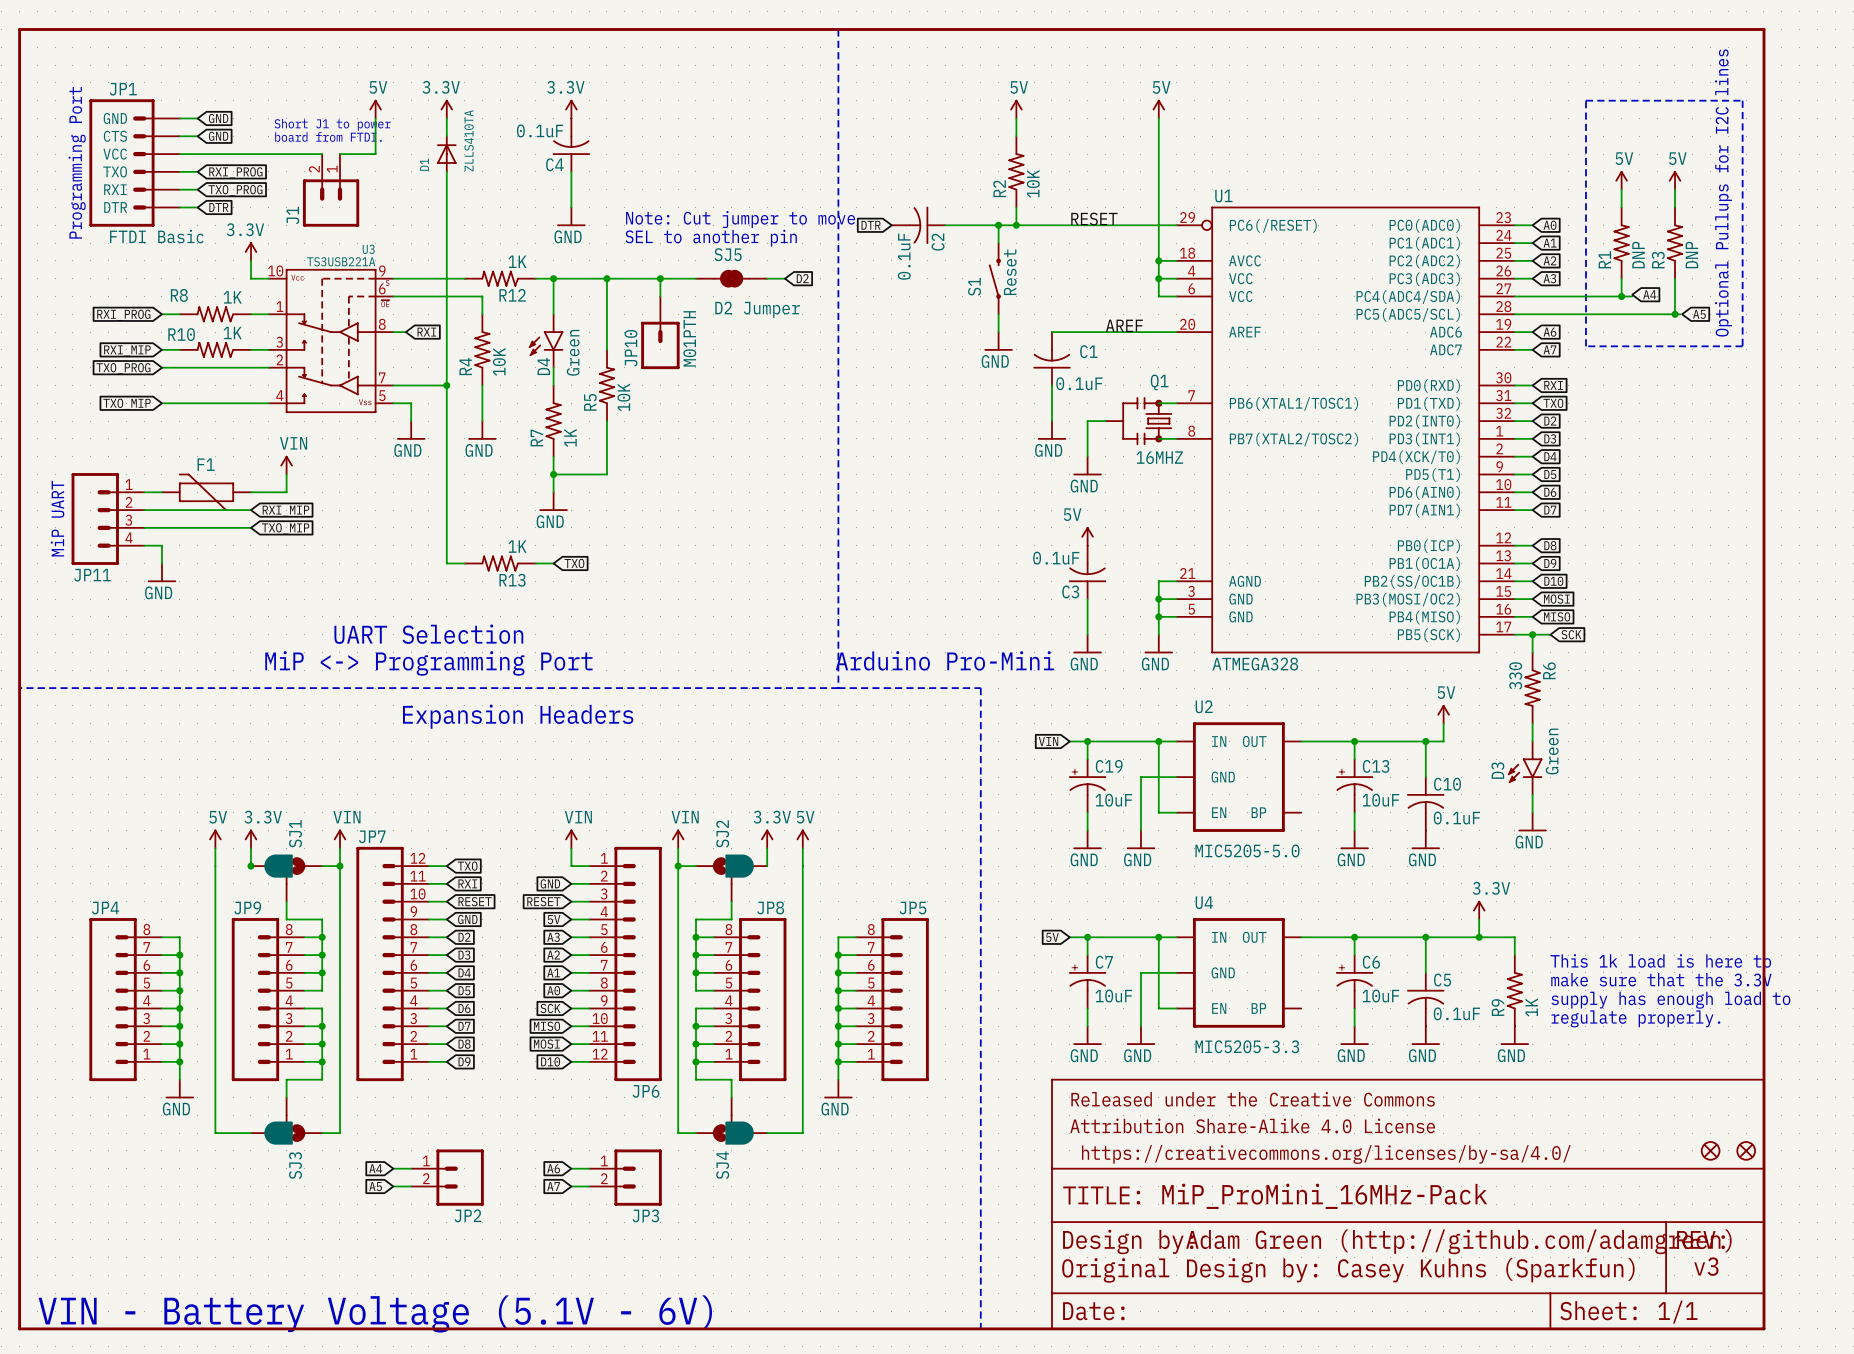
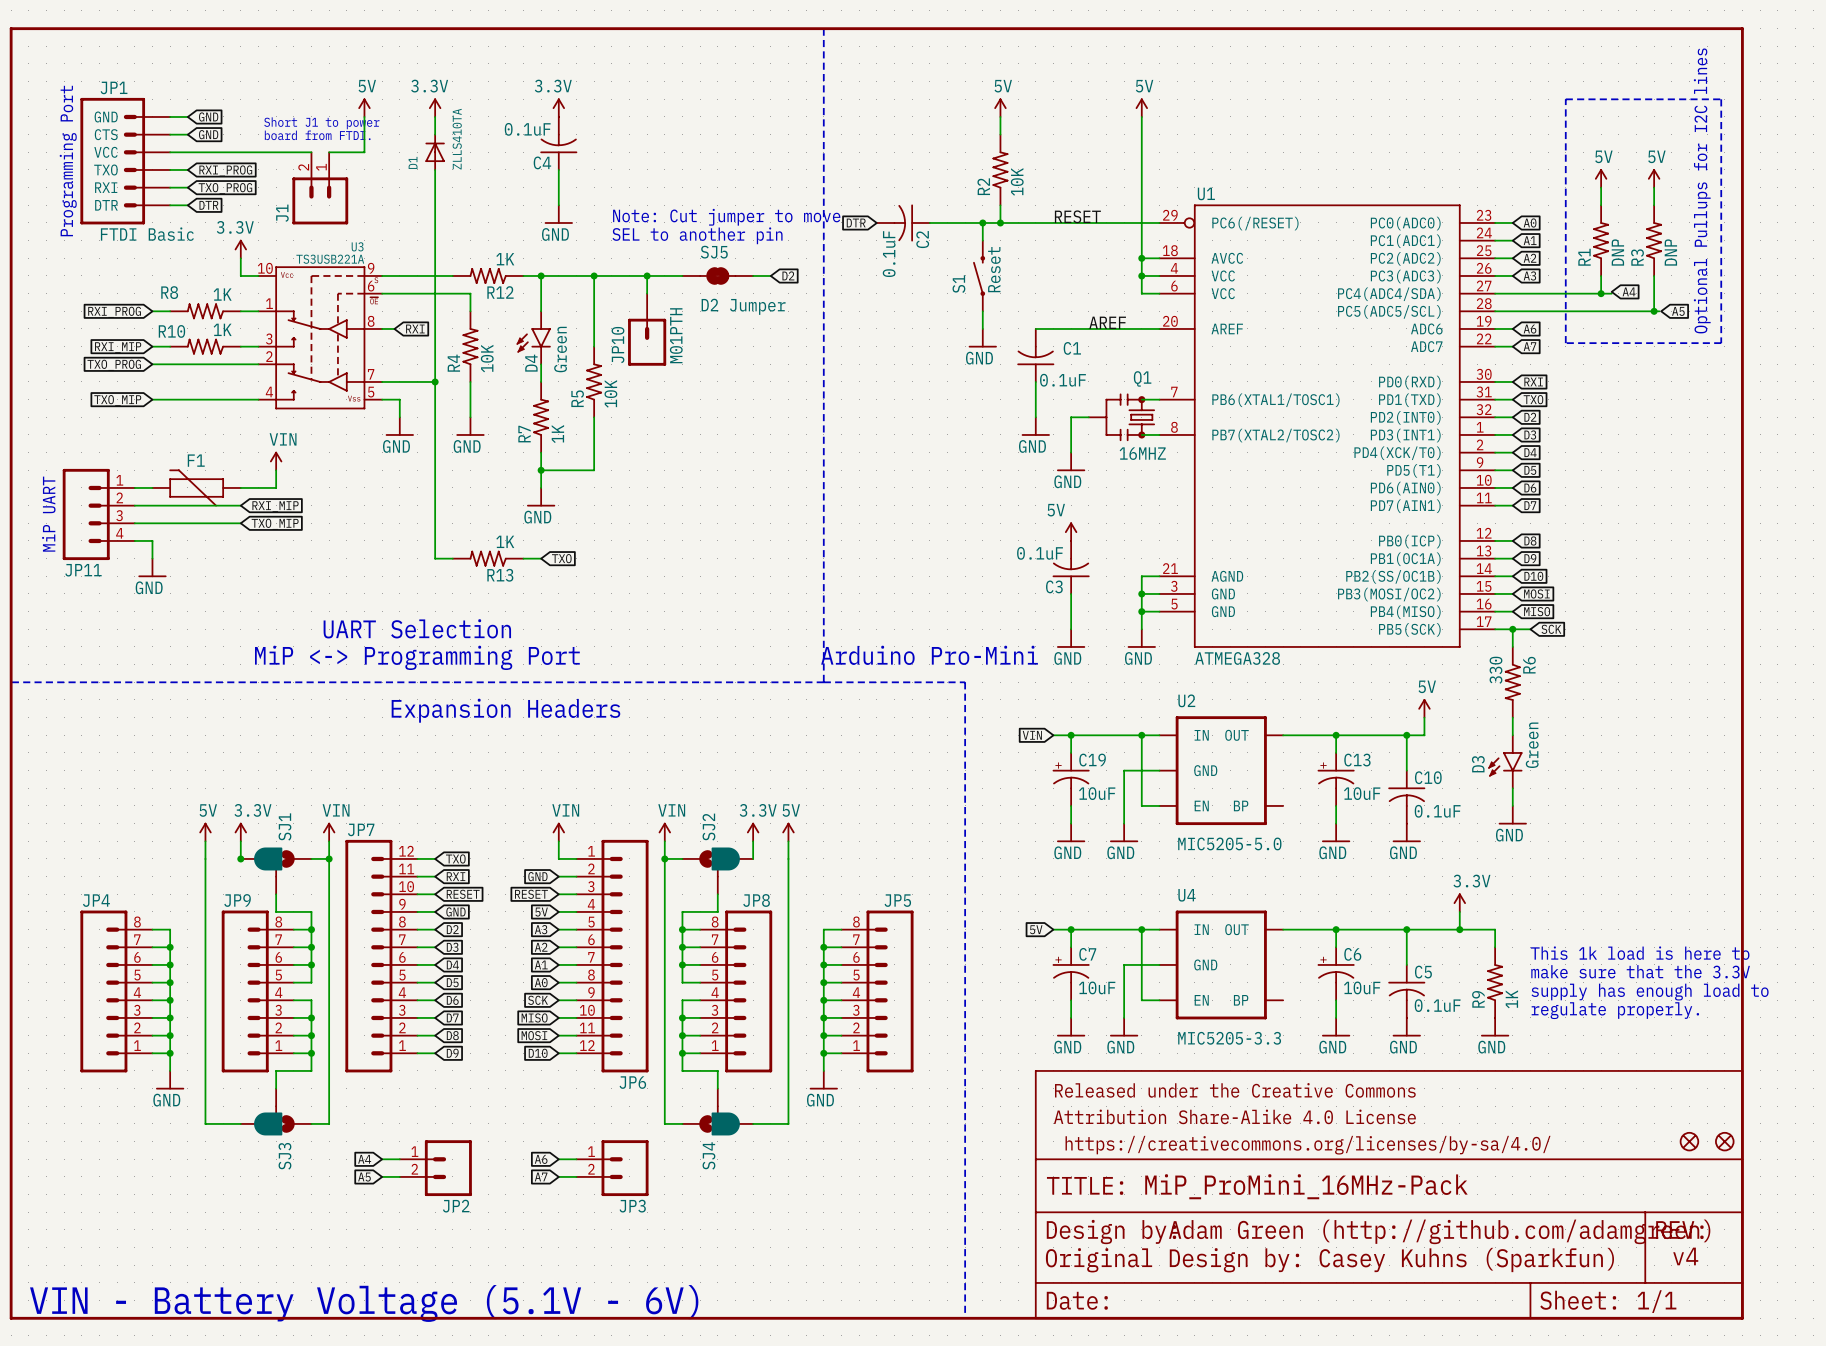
text: v3 (1706, 1266) -> v4 (1685, 1256)

